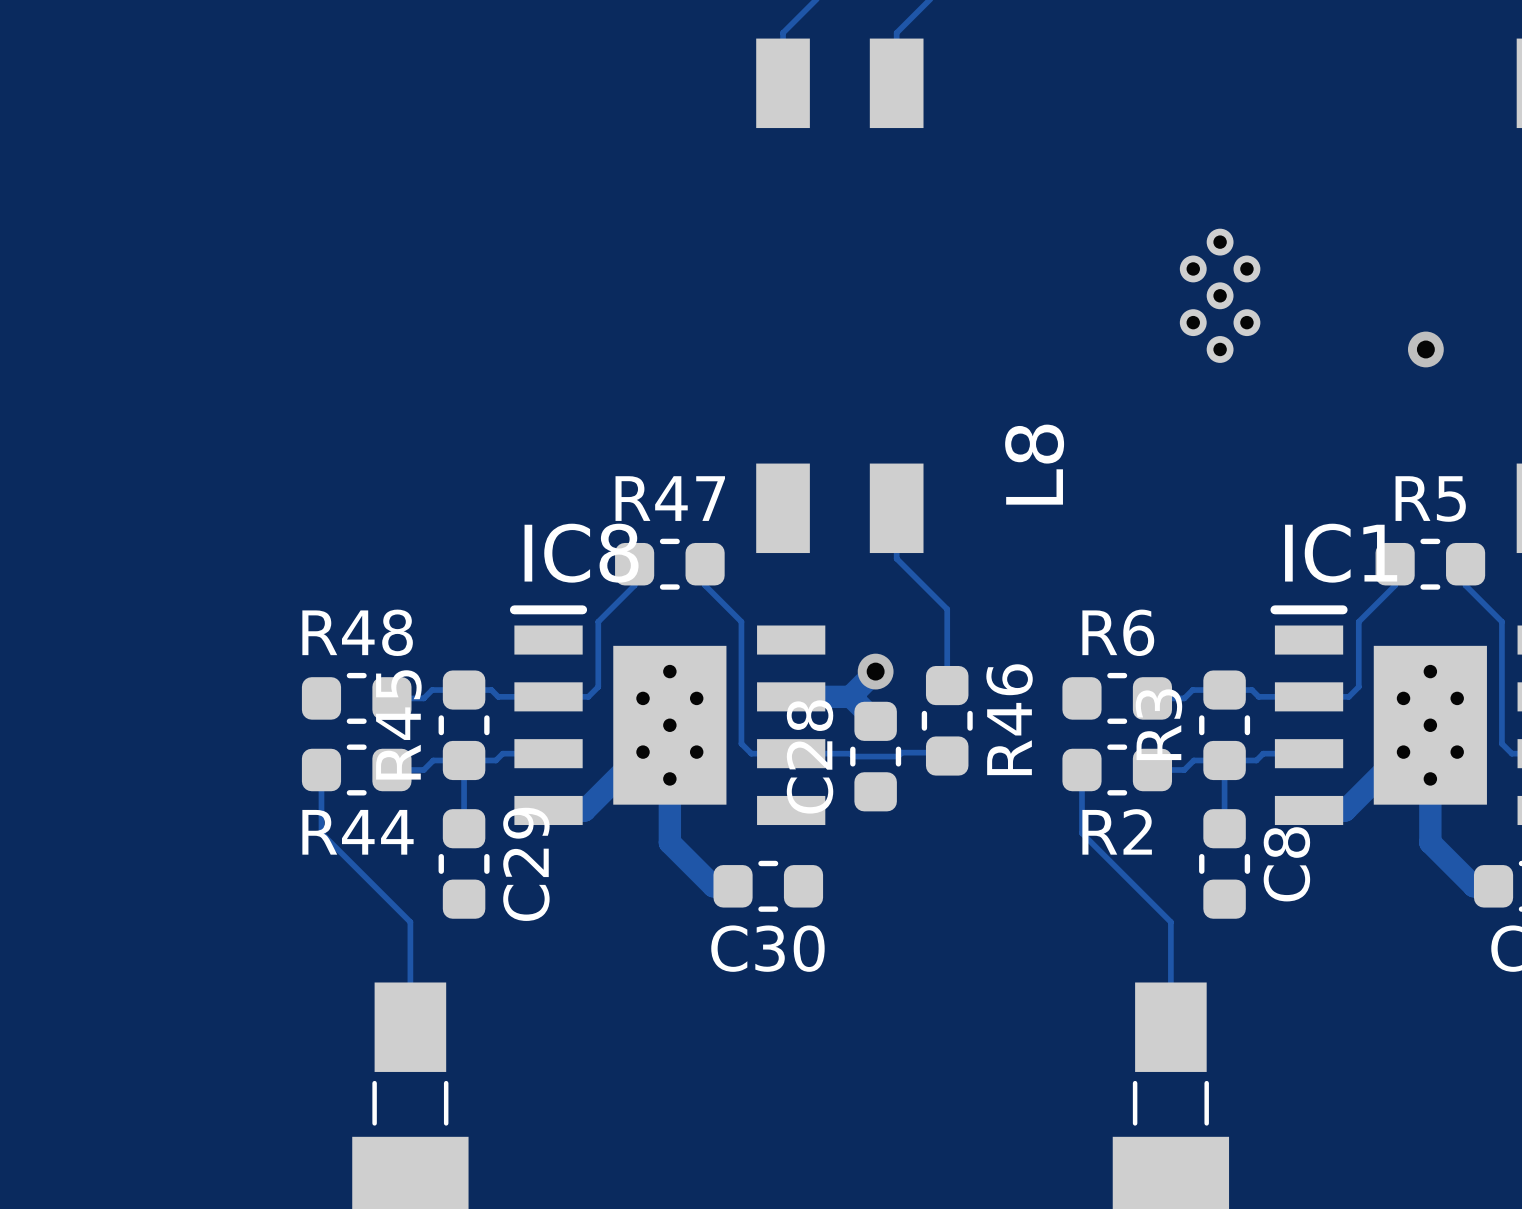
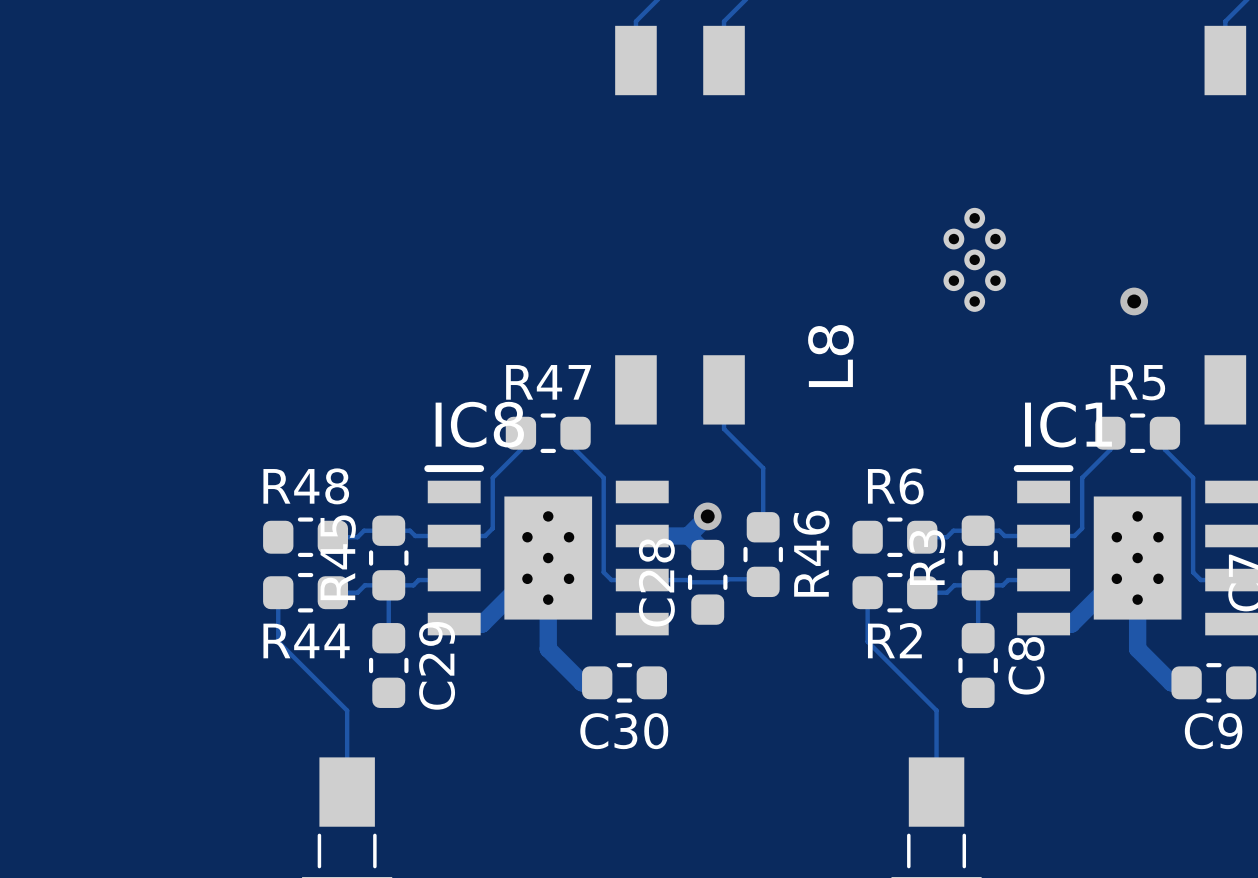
part position: (1220, 295) -> (974, 259)
via position: (1425, 349) -> (1134, 301)

